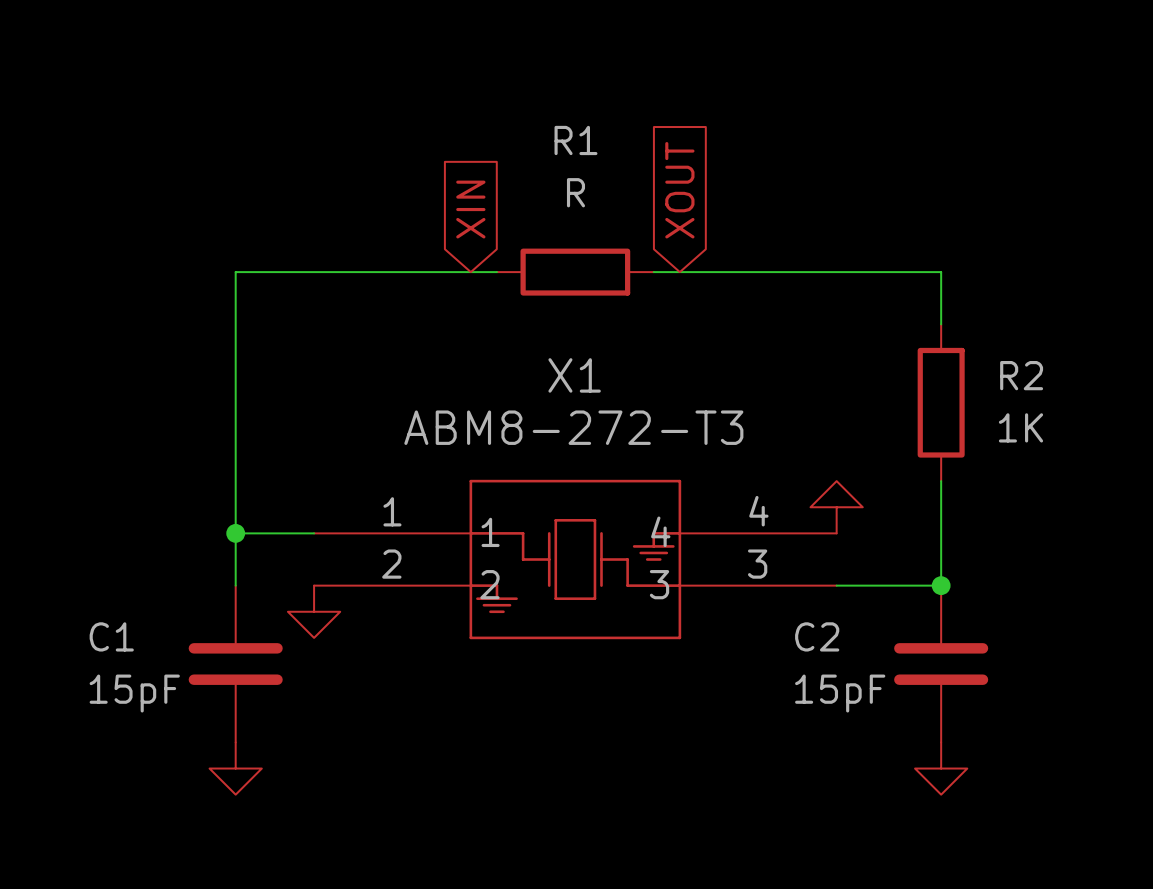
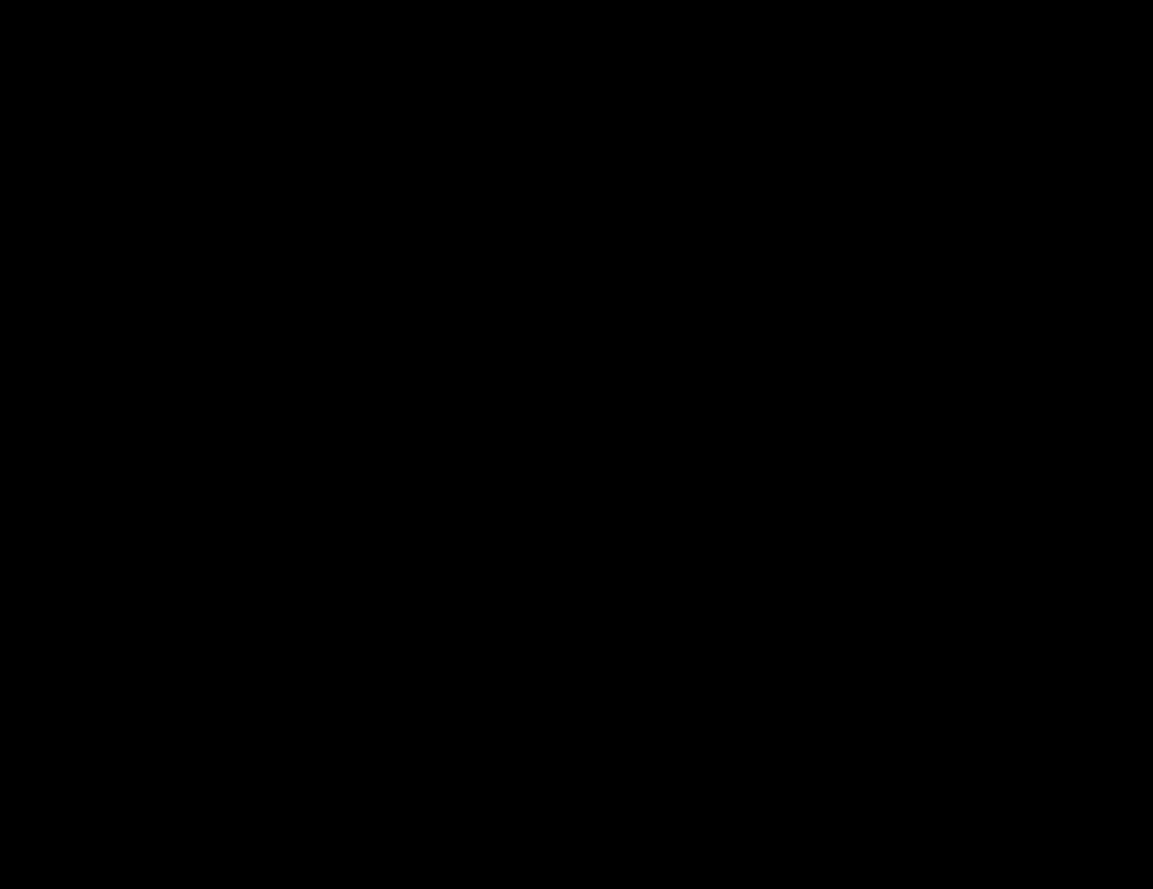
global label: XOUT (679, 190) -> none
global label: XIN (470, 209) -> none
wire: (496, 272) (235, 272) (235, 585) -> none
R1: R (575, 272) -> none
wire: (653, 272) (941, 272) (941, 324) -> none
R2: 1K (941, 402) -> none
wire: (941, 481) (941, 585) (836, 585) -> none
power symbol: (836, 507) -> none
wire: (235, 533) (314, 533) -> none
junction: (235, 533) -> none
X1: ABM8-272-T3 (575, 559) -> none
junction: (941, 585) -> none
power symbol: (314, 611) -> none
C1: 15pF (235, 664) -> none
C2: 15pF (941, 664) -> none
power symbol: (235, 768) -> none
power symbol: (941, 768) -> none

